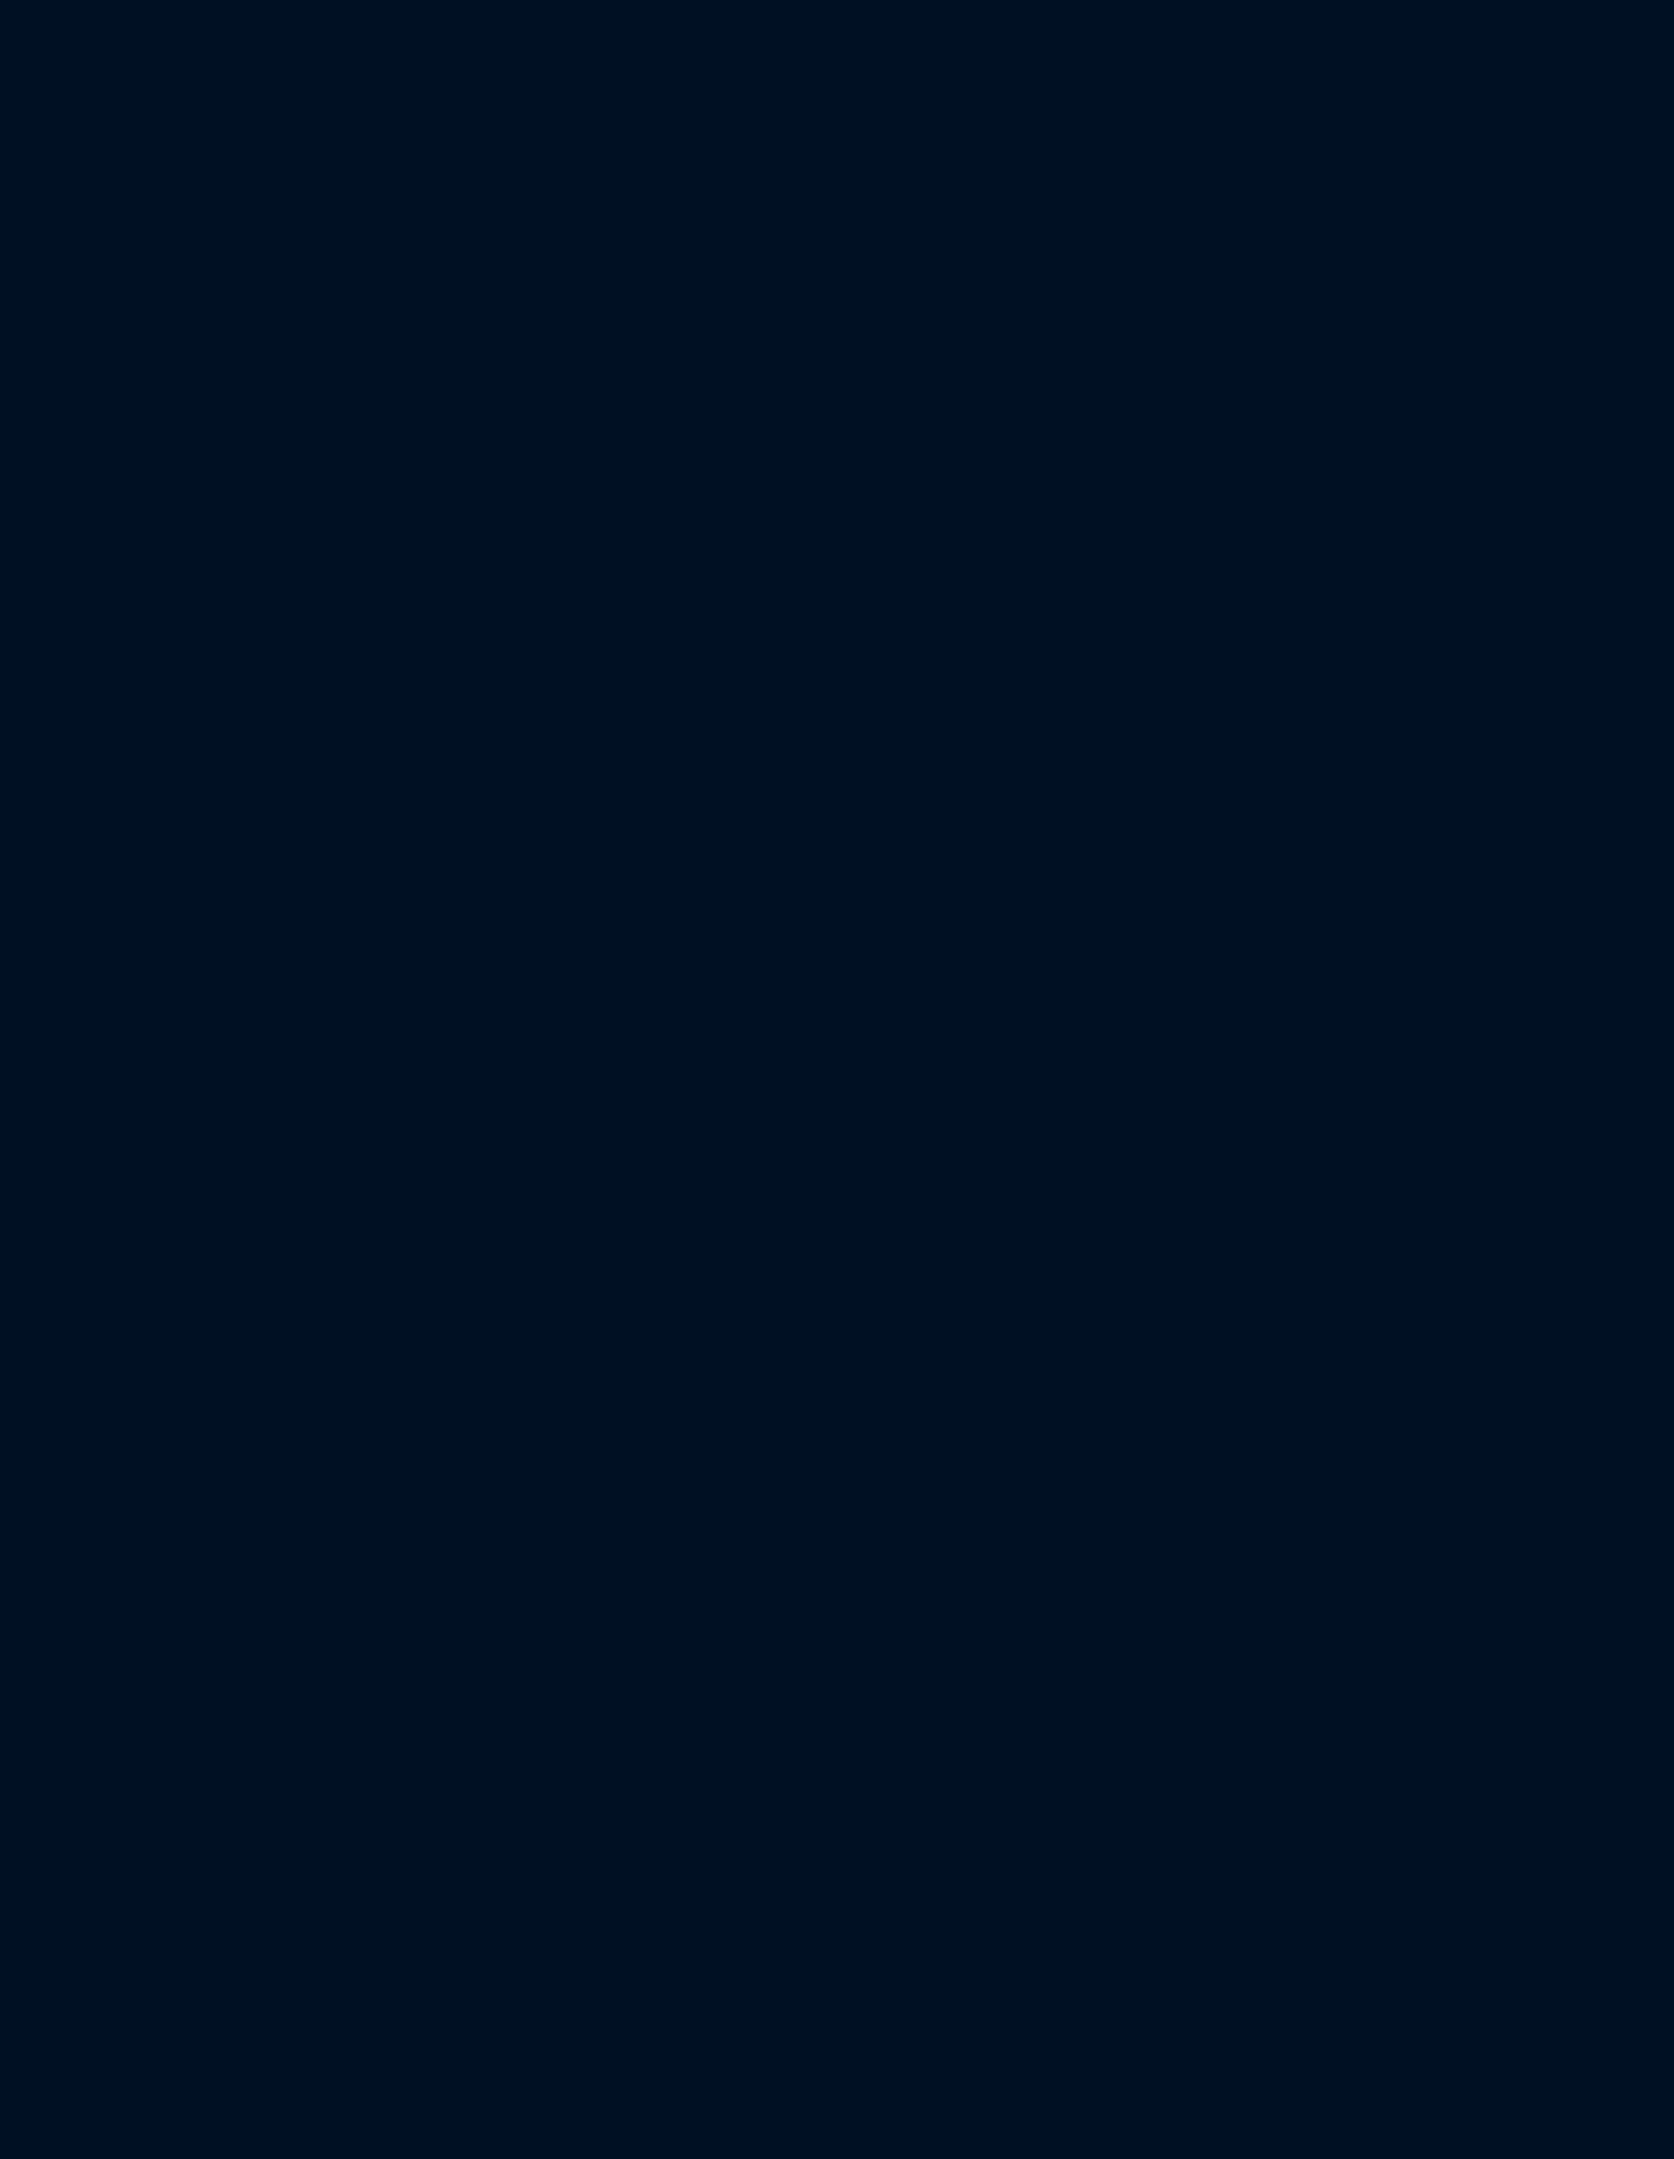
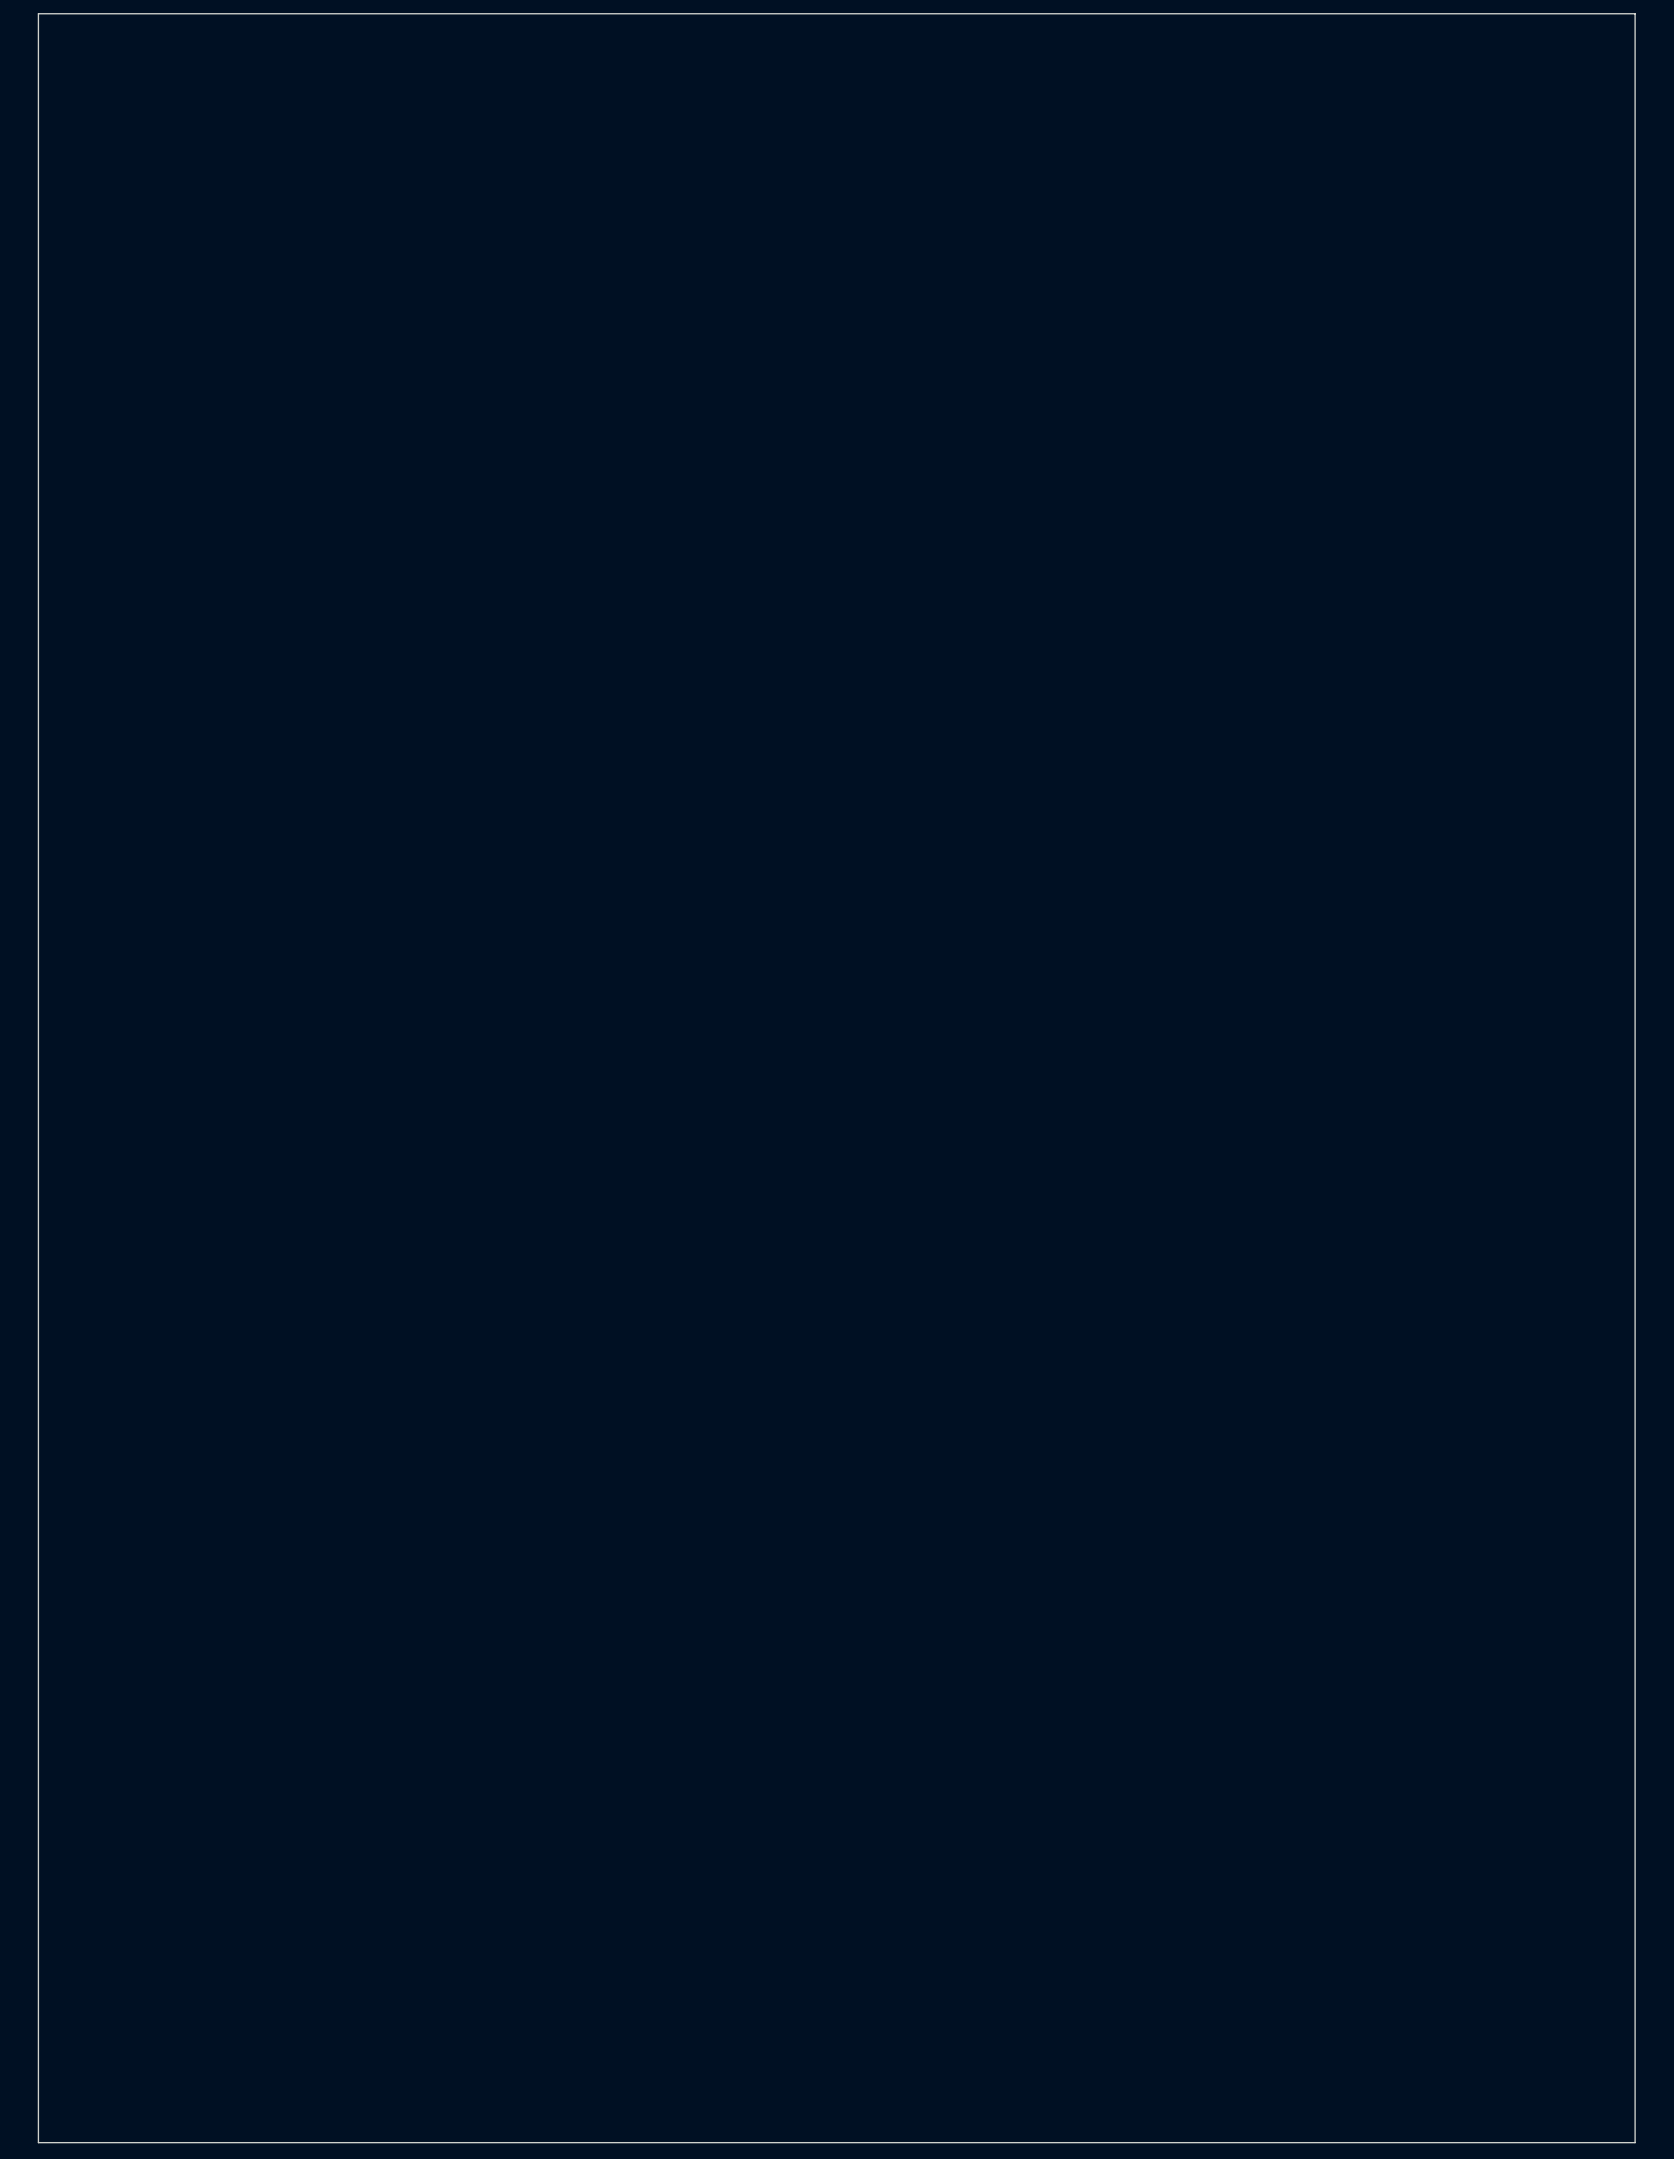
board edge: none -> (1635, 13) (38, 13) (38, 2142) (1635, 2142) (1635, 13)

